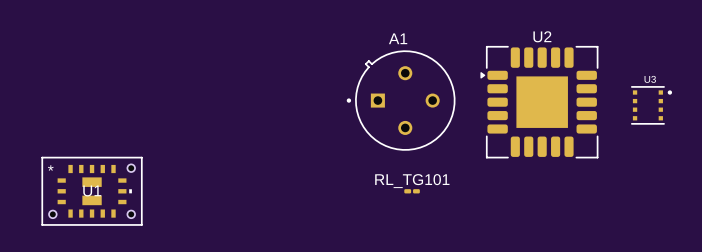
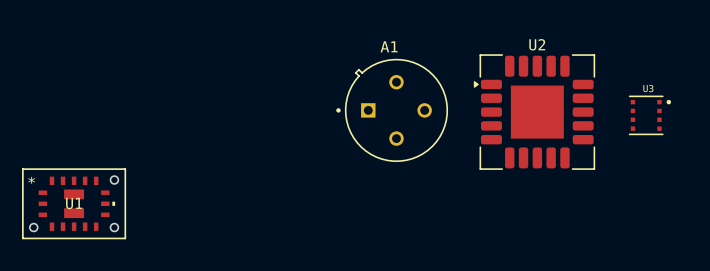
RL_TG101: (412, 191) -> none

